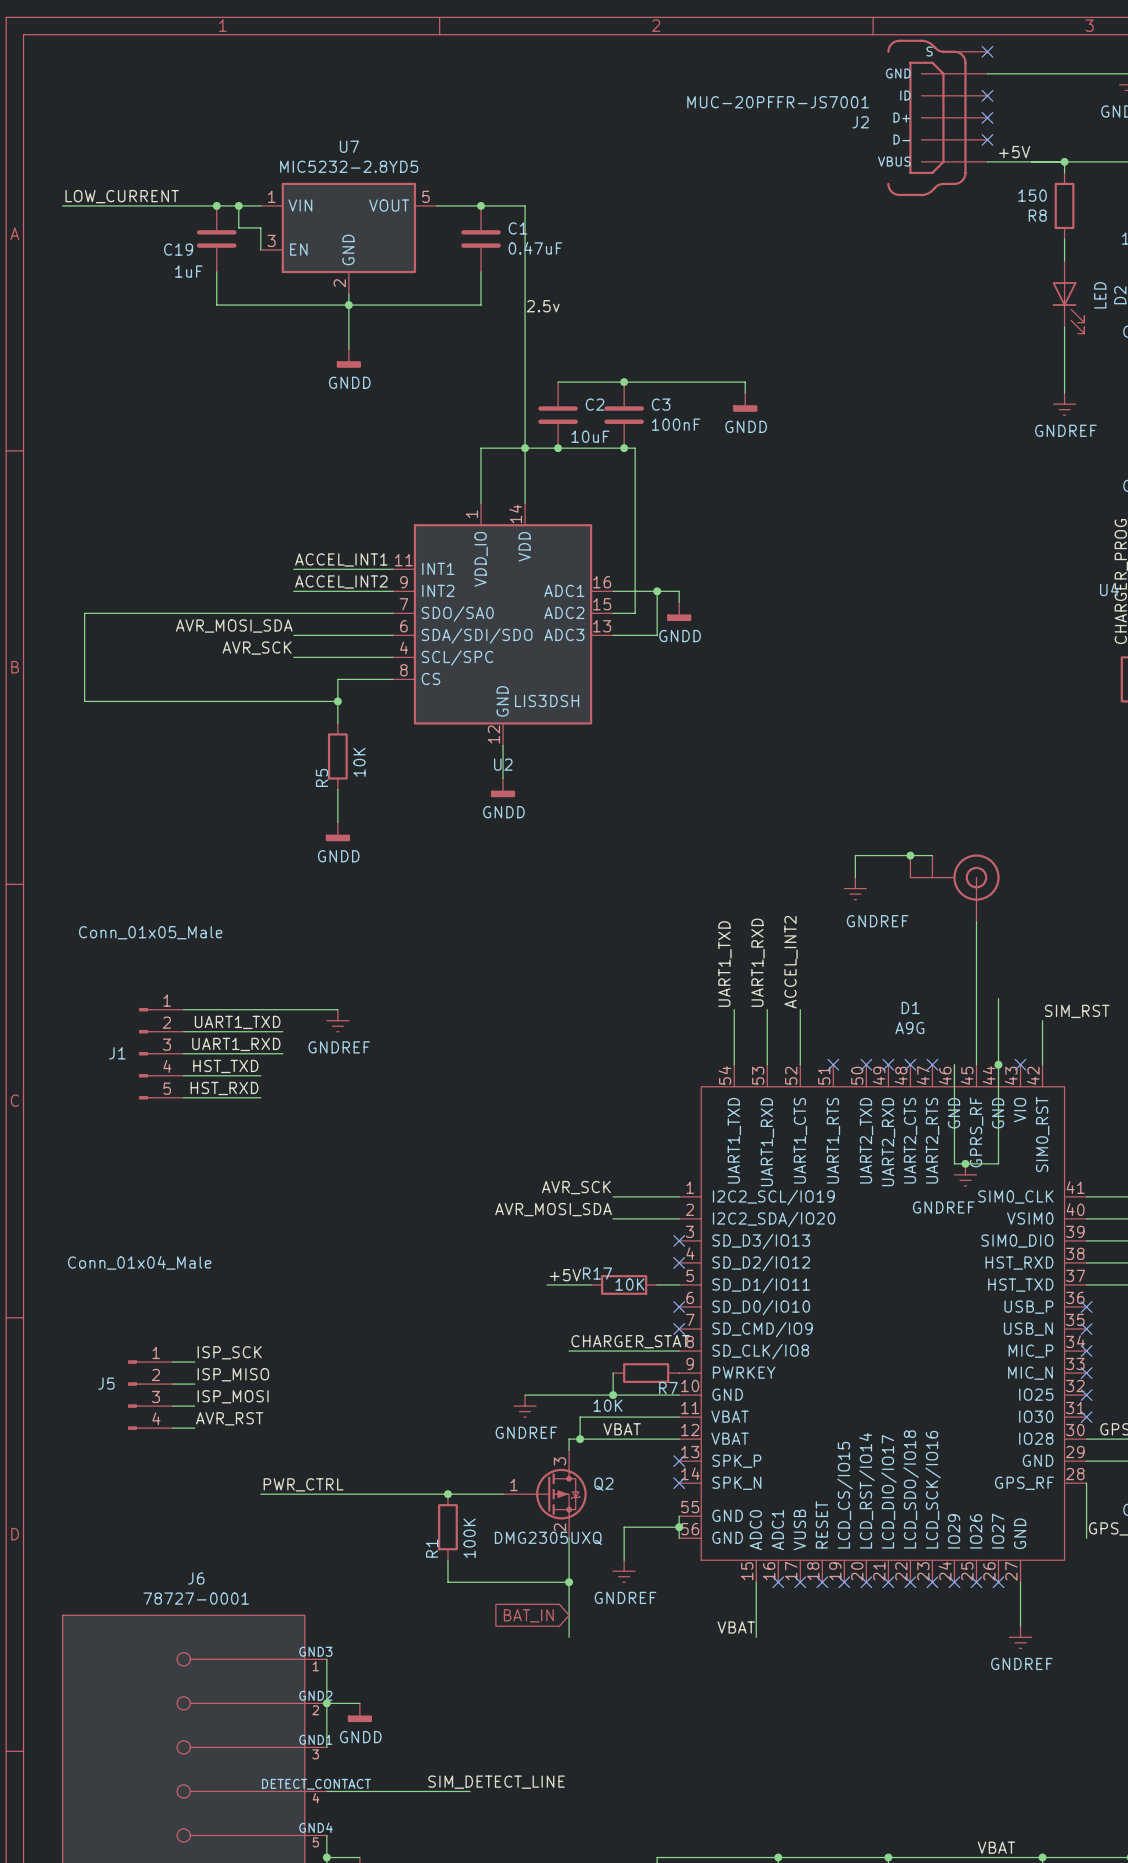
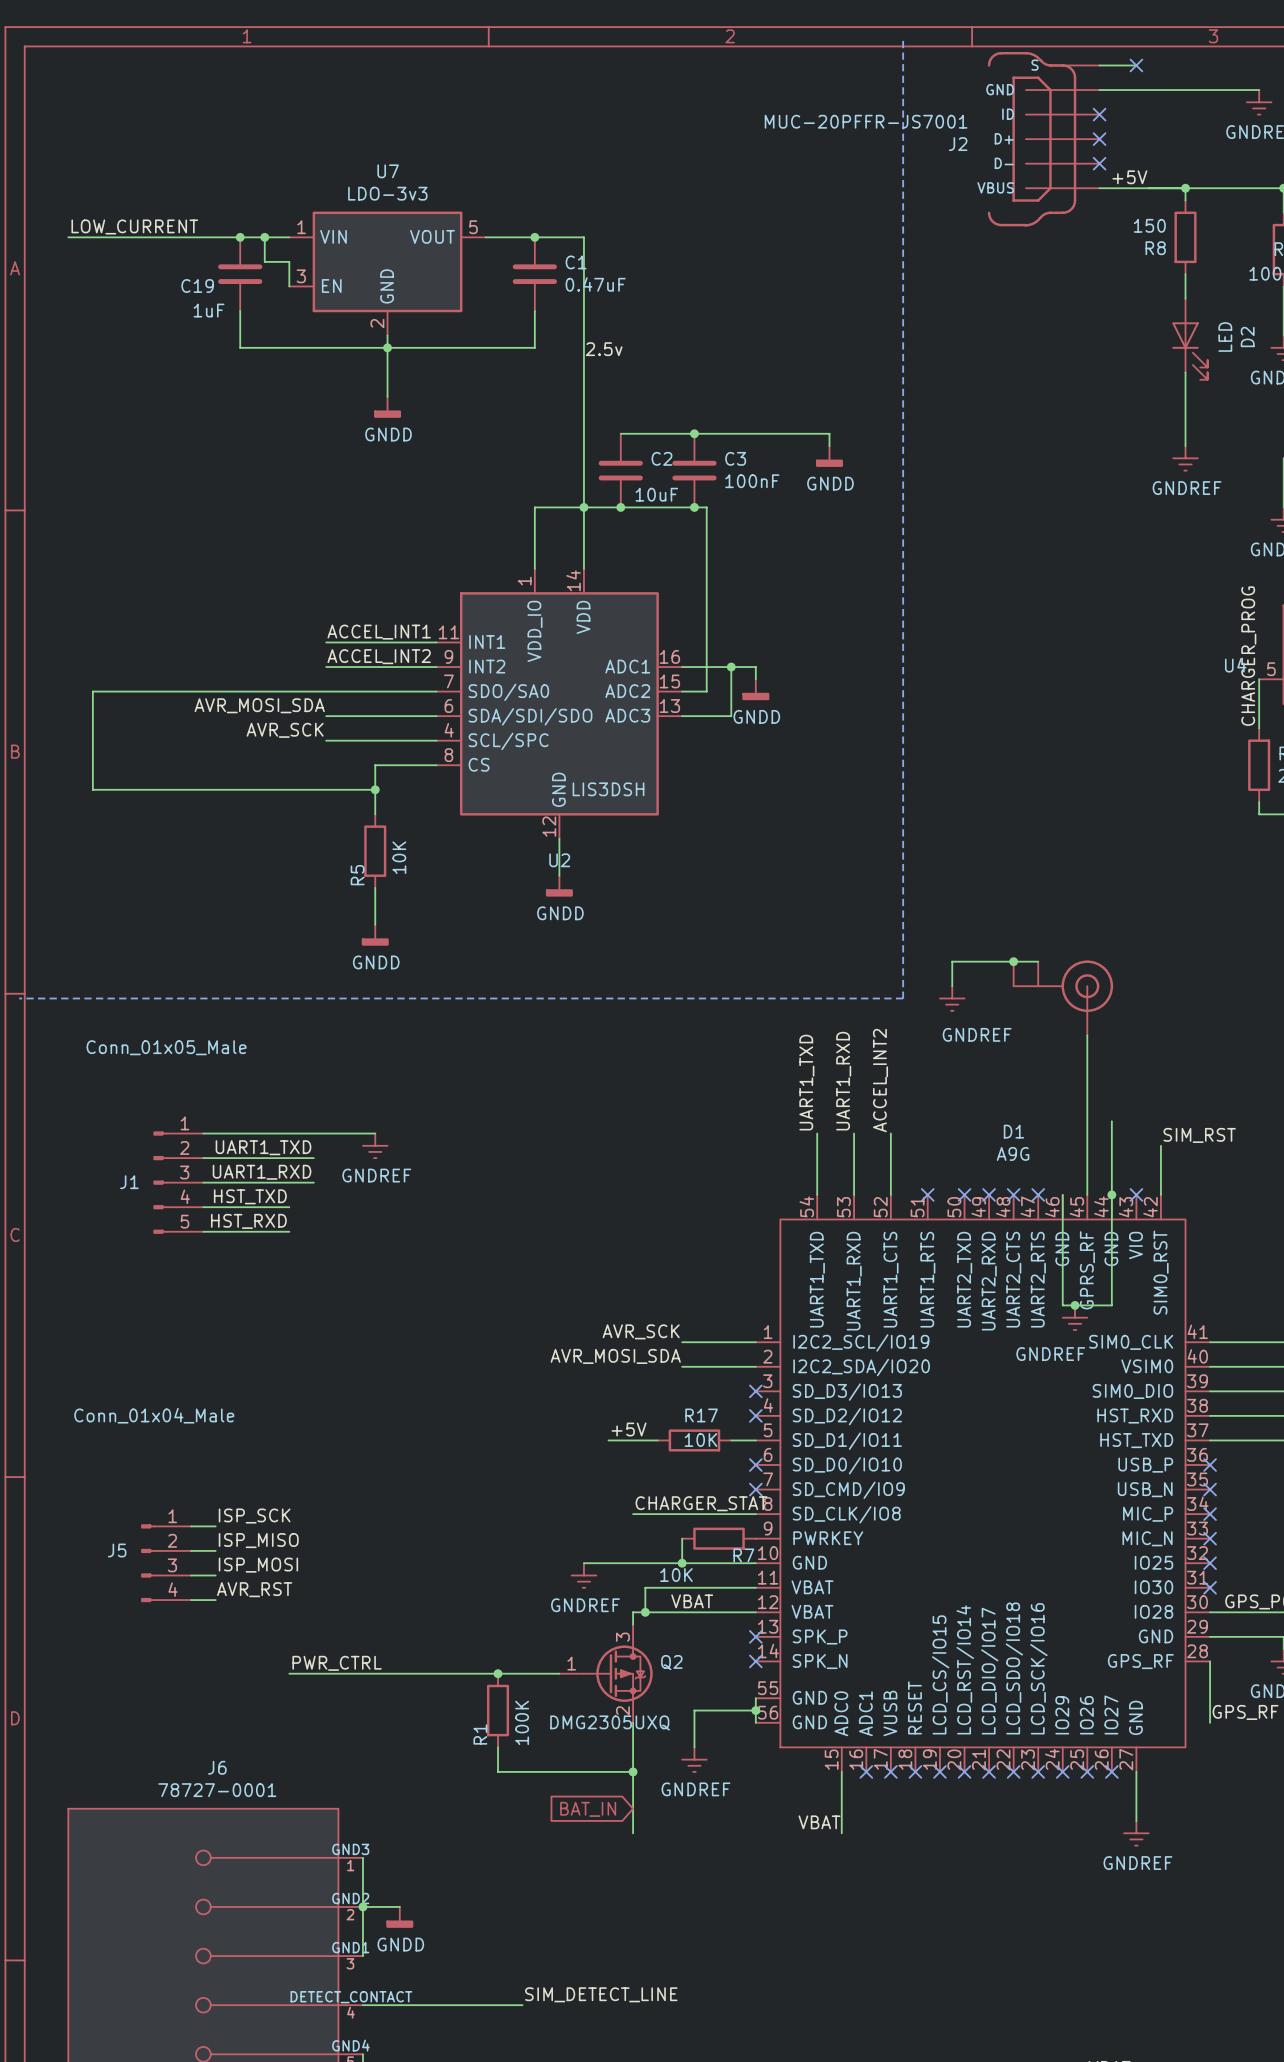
line: none -> (903, 40) (903, 998) (19, 998)
wire: none -> (1099, 65) (1136, 65)
no-connect mark position: (987, 51) -> (1136, 65)
U7 value: MIC5232-2.8YD5 (349, 166) -> LDO-3v3 (387, 193)
R17 name position: R17 (597, 1273) -> R17 (701, 1415)
label position: SIM_DETECT_LINE (496, 1782) -> SIM_DETECT_LINE (601, 1994)

